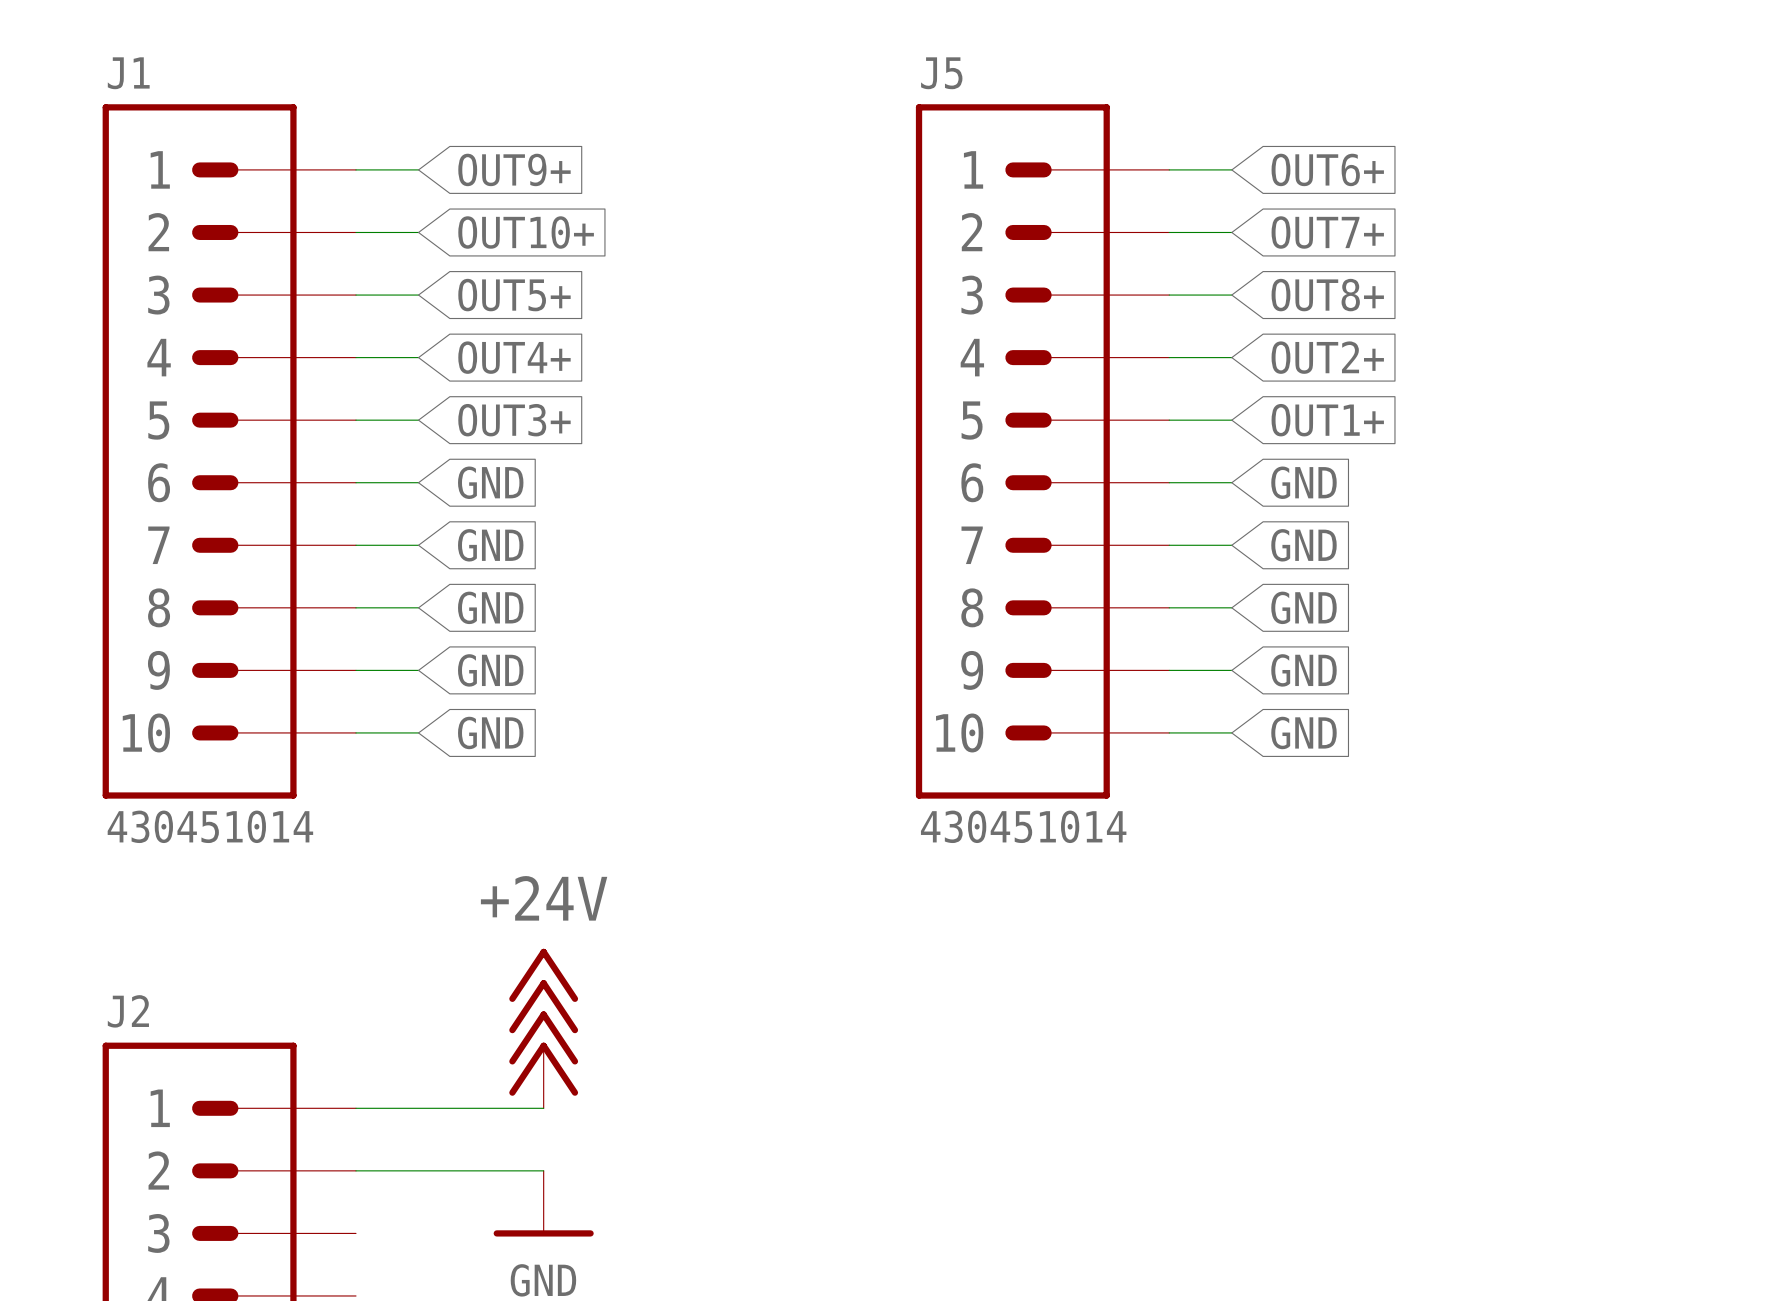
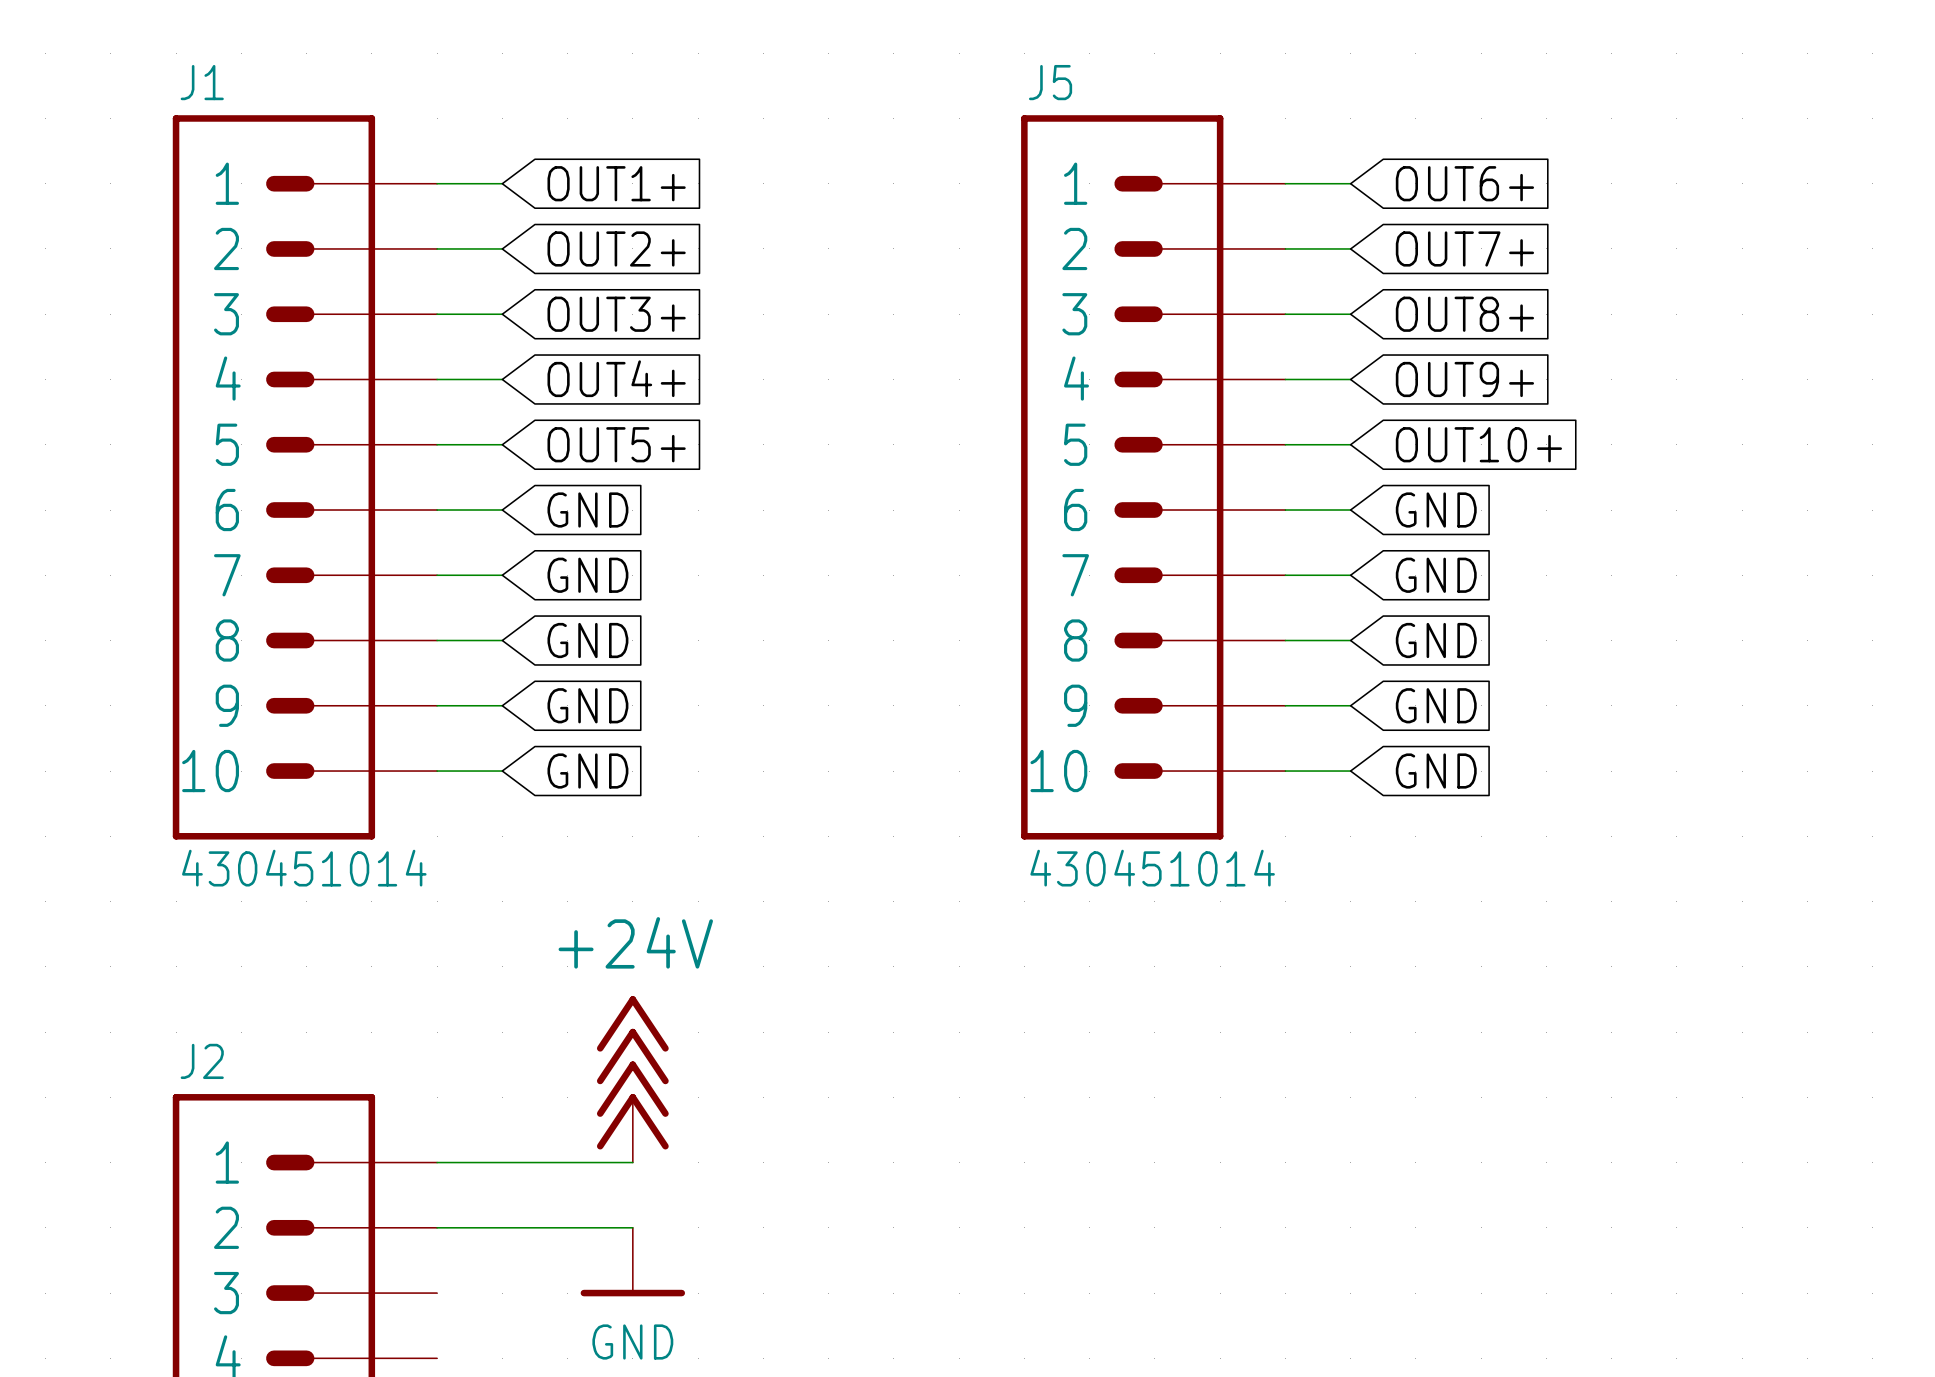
global label: OUT9+ (514, 169) -> OUT1+ (616, 183)
global label: OUT10+ (526, 232) -> OUT2+ (616, 248)
global label: OUT5+ (514, 295) -> OUT3+ (616, 314)
global label: OUT2+ (1327, 357) -> OUT9+ (1464, 379)
global label: OUT3+ (514, 420) -> OUT5+ (616, 444)
global label: OUT1+ (1327, 420) -> OUT10+ (1478, 444)

